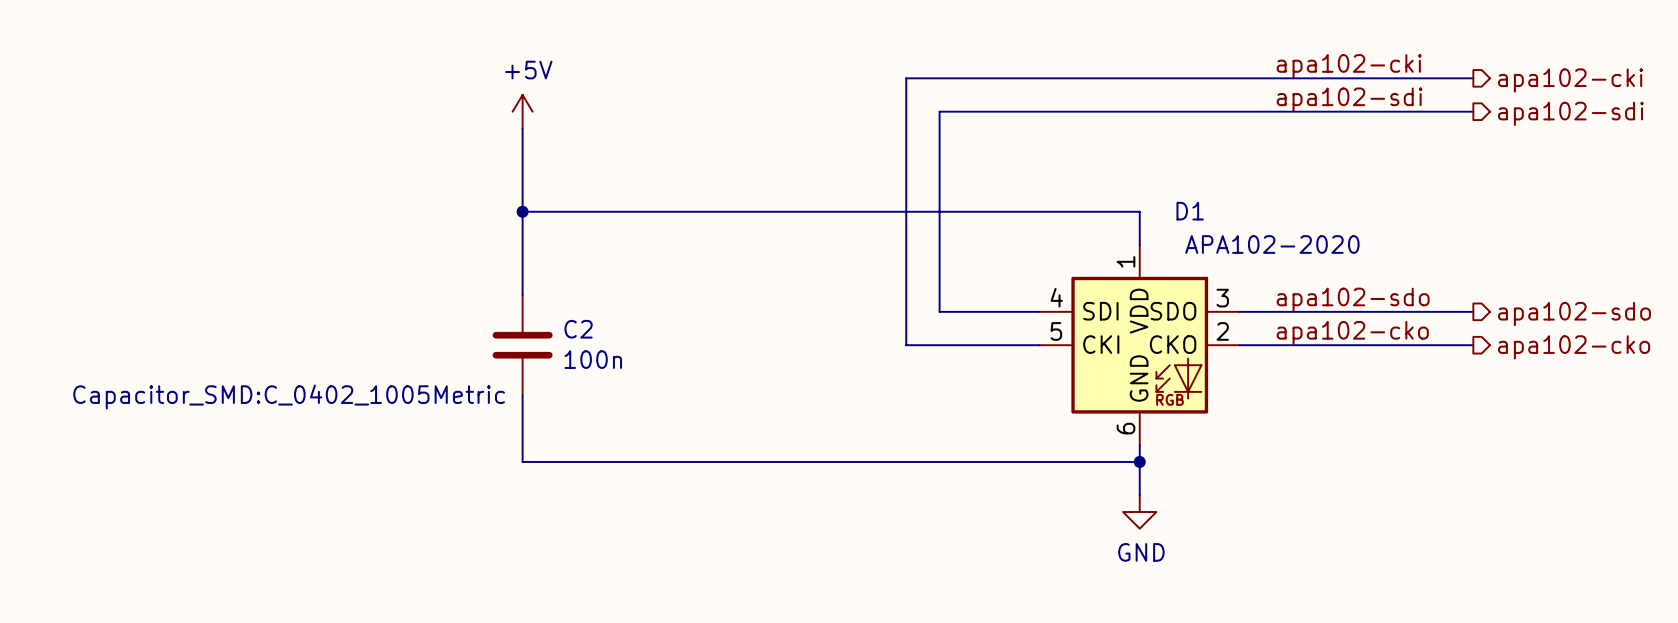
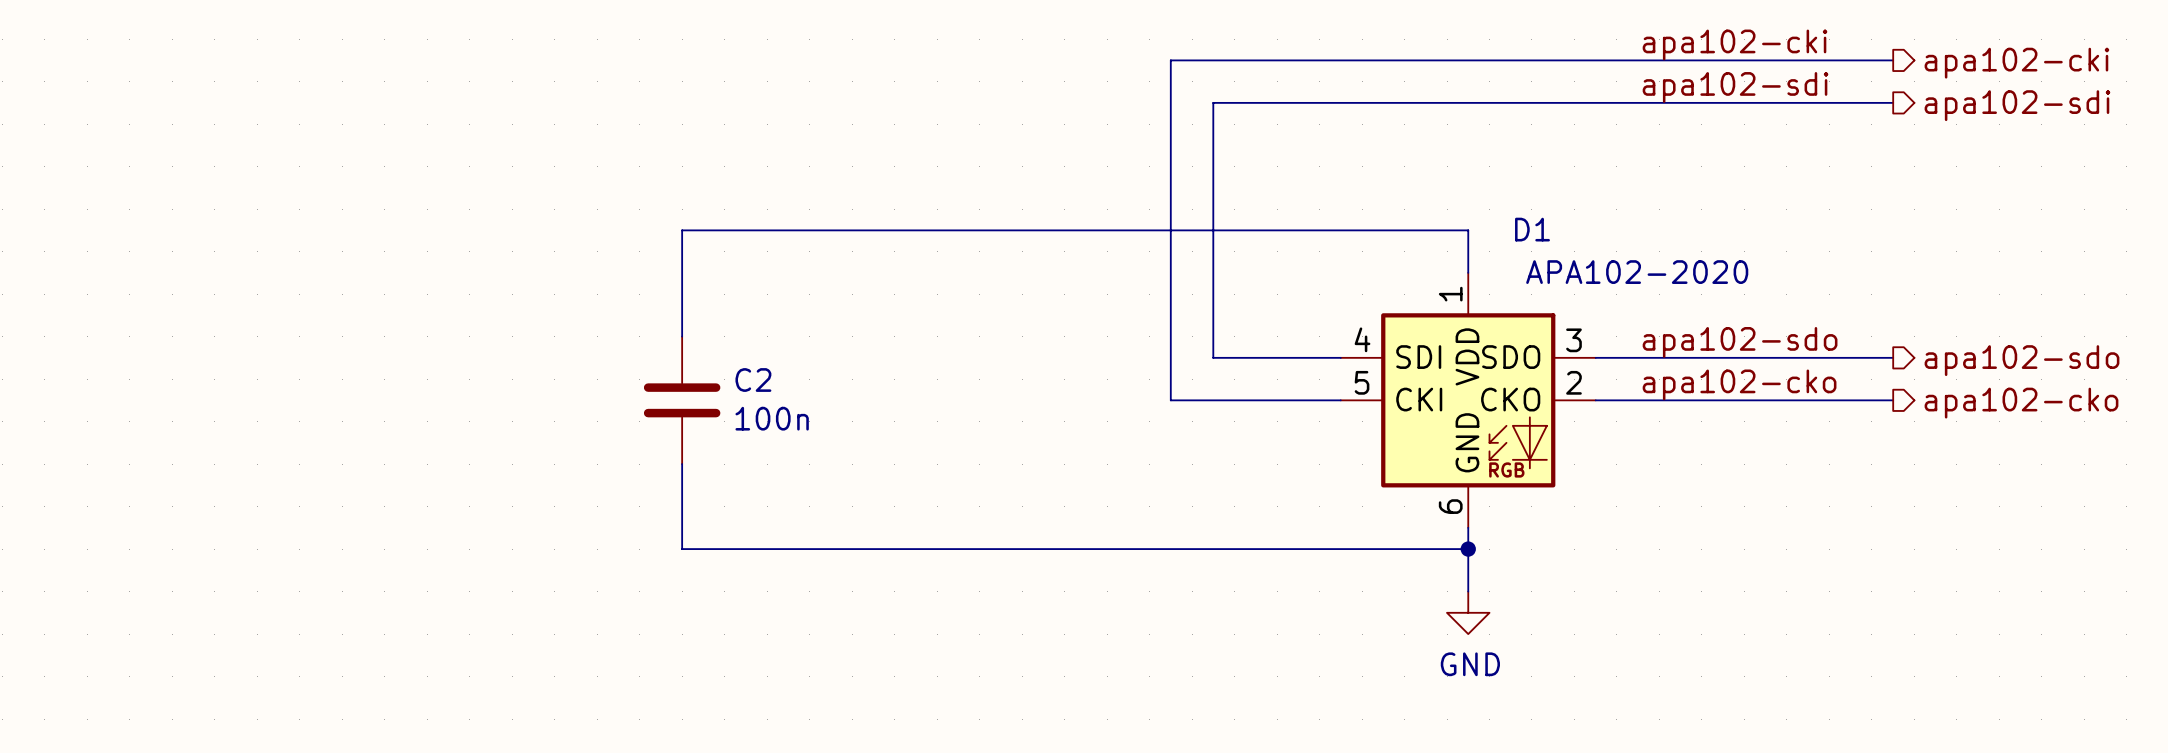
power symbol: +5V (522, 111) -> none
wire: (522, 128) (522, 211) -> none
junction: (522, 211) -> none
C2 text: Capacitor_SMD:C_0402_1005Metric (289, 397) -> none

